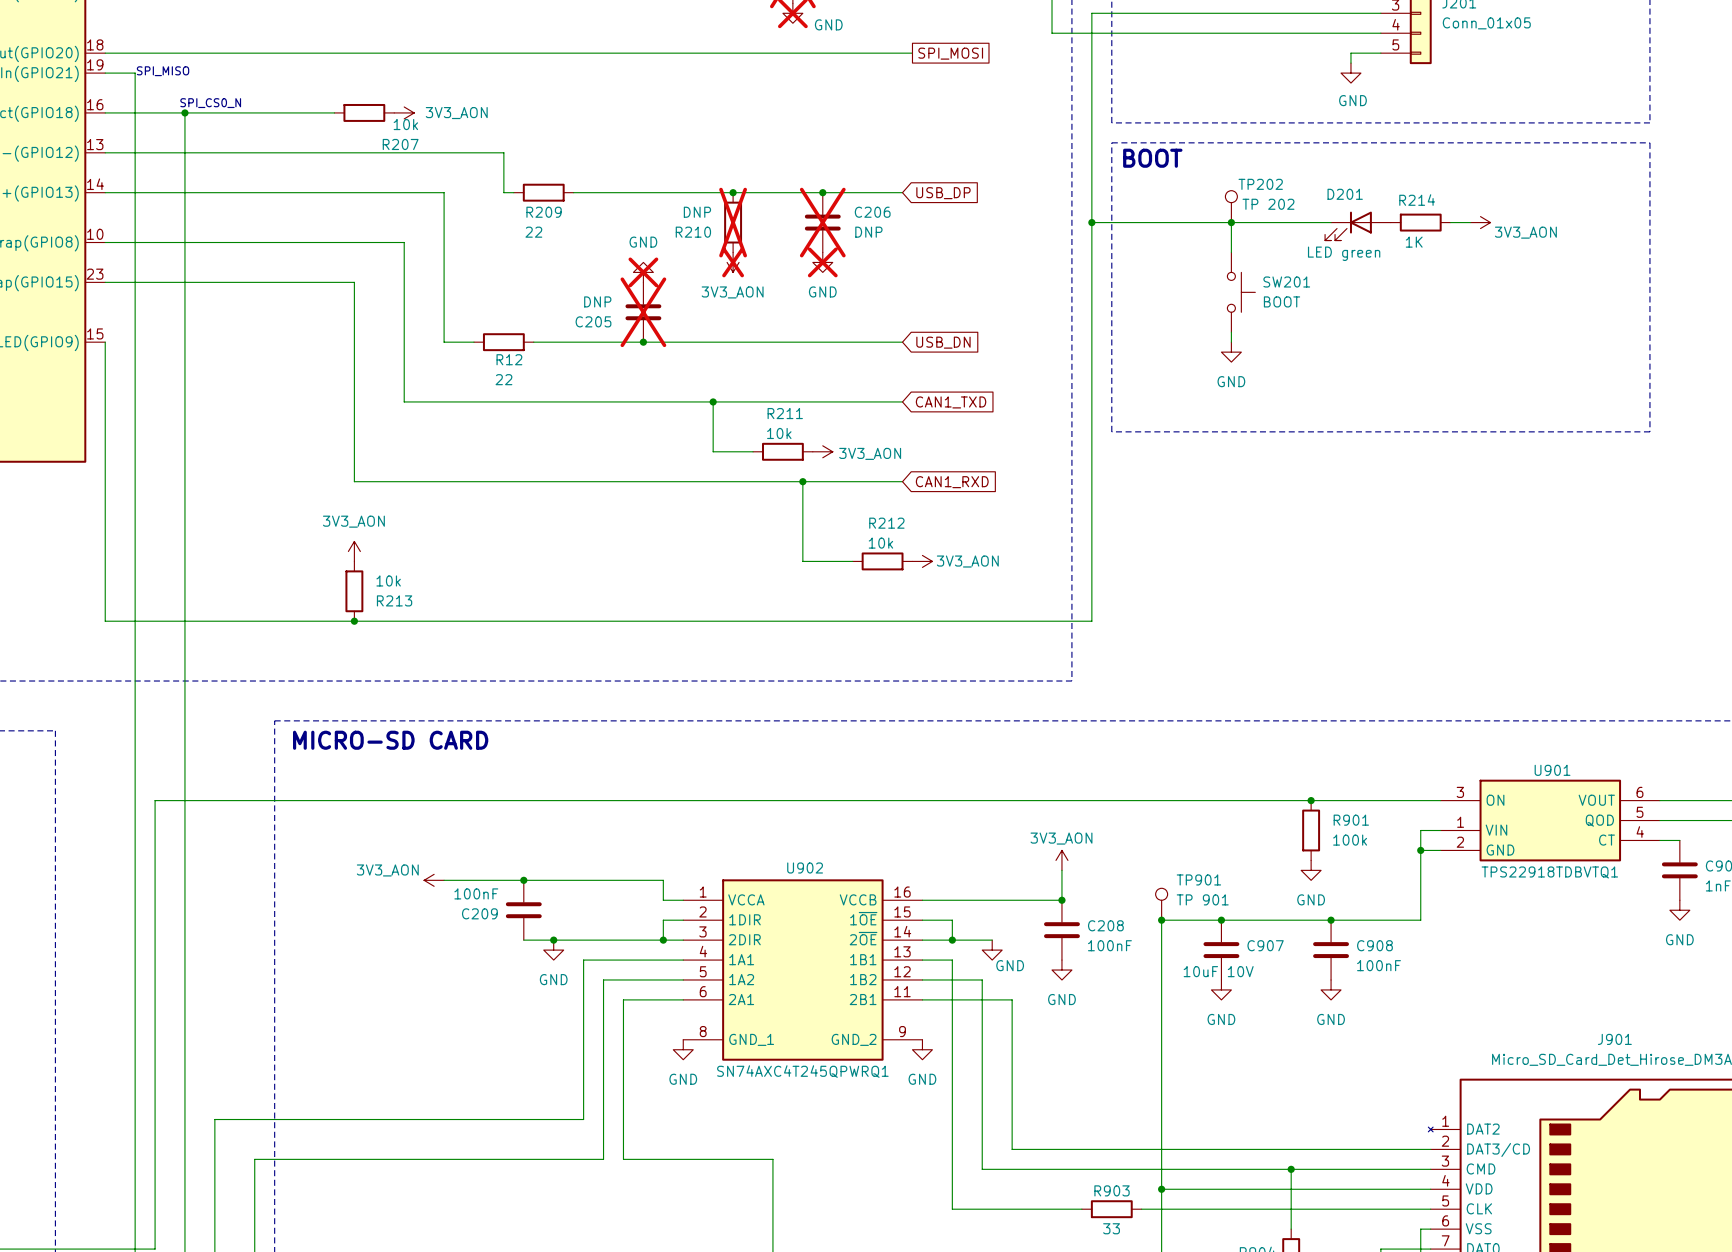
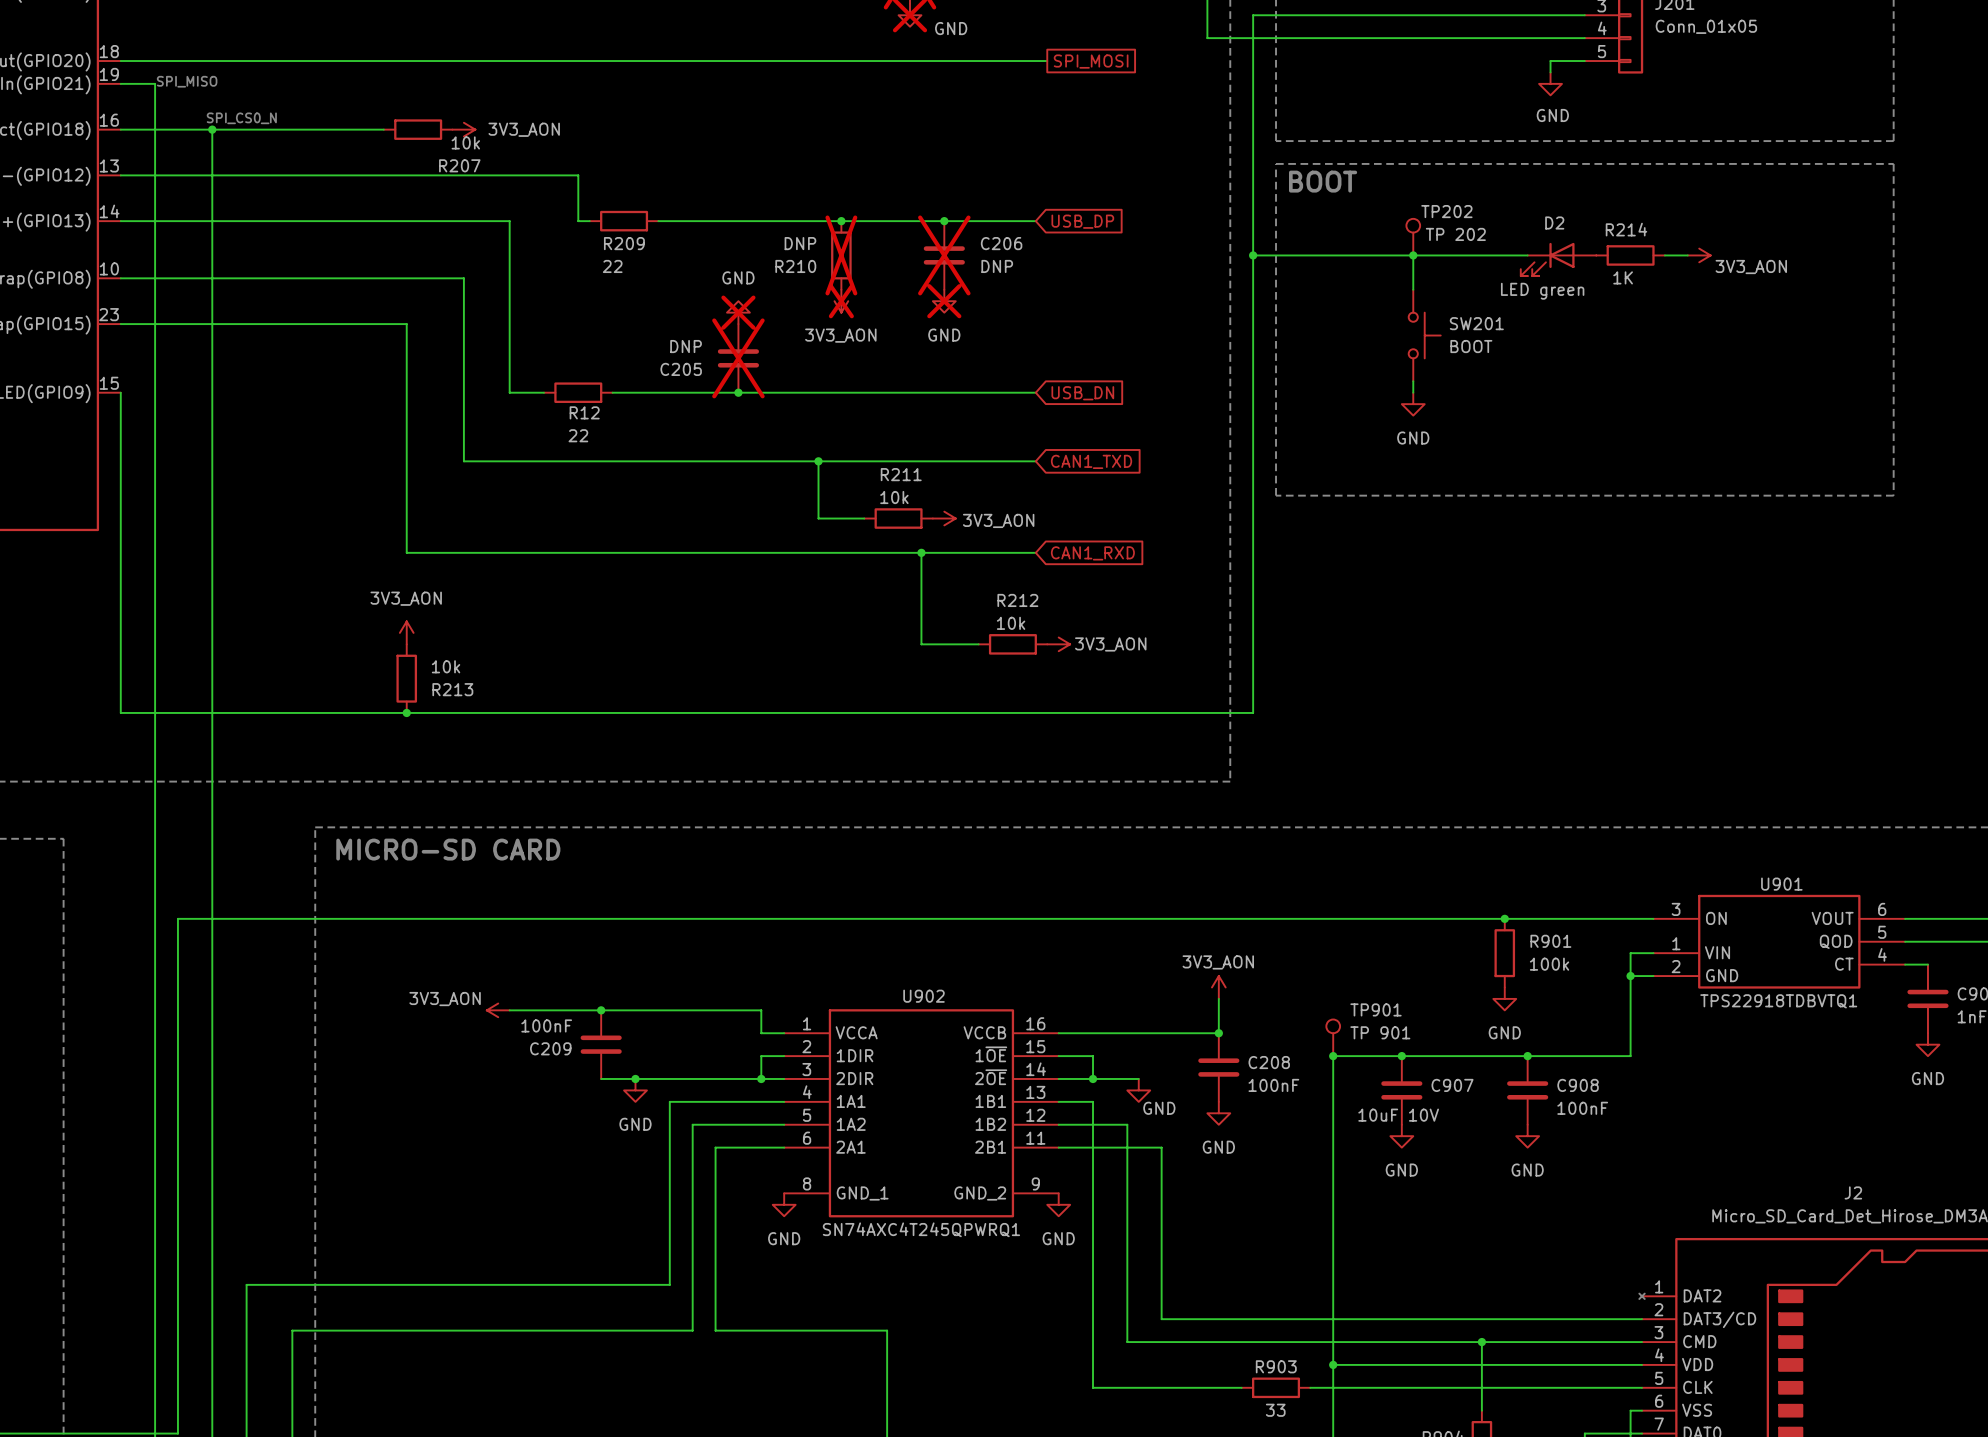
D201 name: D201 (1345, 194) -> D2 (1554, 223)
J901 name: J901 (1614, 1039) -> J2 (1853, 1192)

